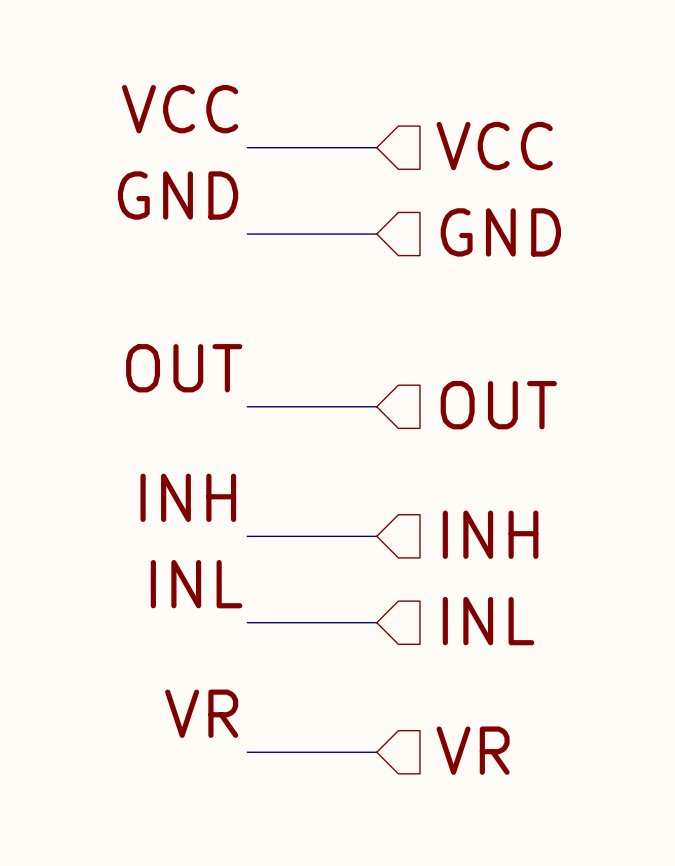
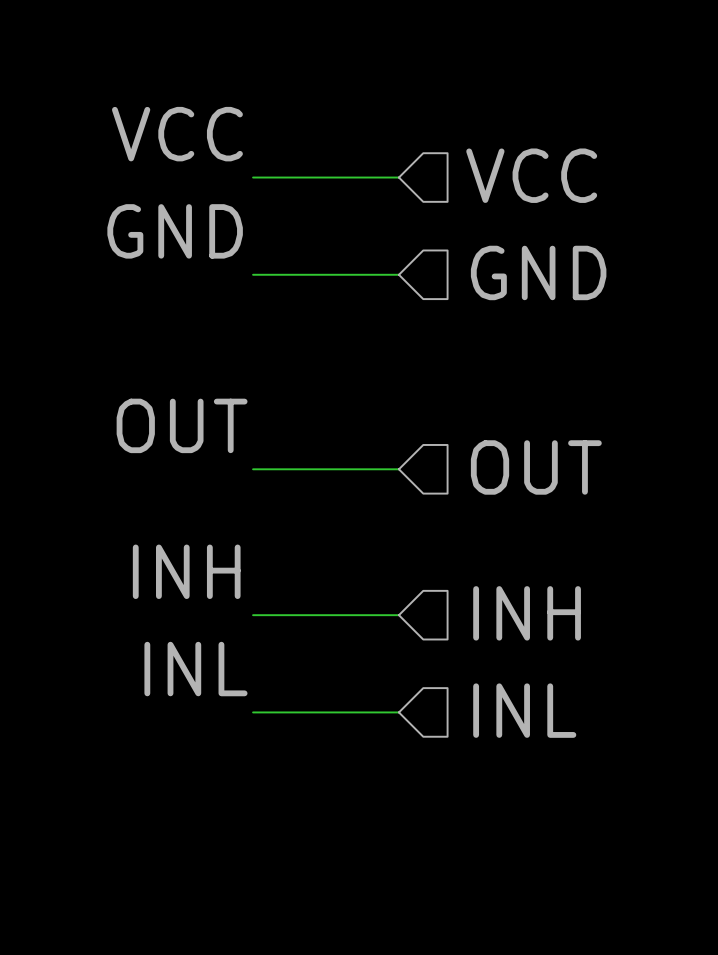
label: VR (201, 713) -> none
hierarchical label: VR (473, 750) -> none
wire: (247, 752) (376, 752) -> none

